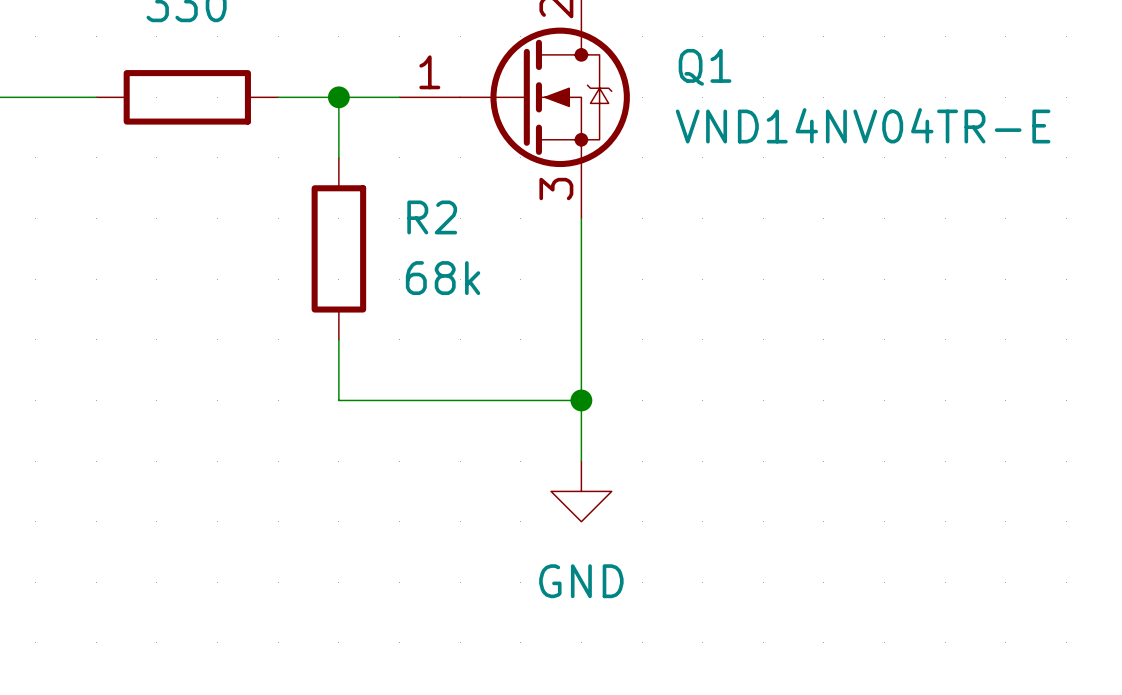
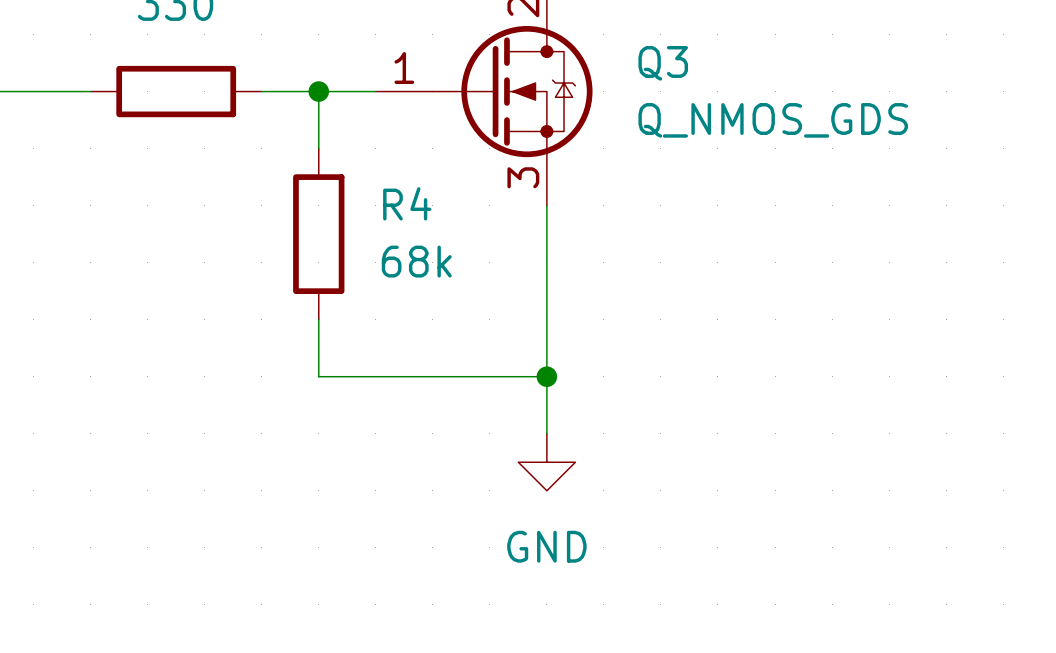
Q1 name: Q1 (705, 67) -> Q3 (663, 63)
Q1 value: VND14NV04TR-E (863, 125) -> Q_NMOS_GDS (773, 120)
R2 name: R2 (432, 217) -> R4 (407, 203)

